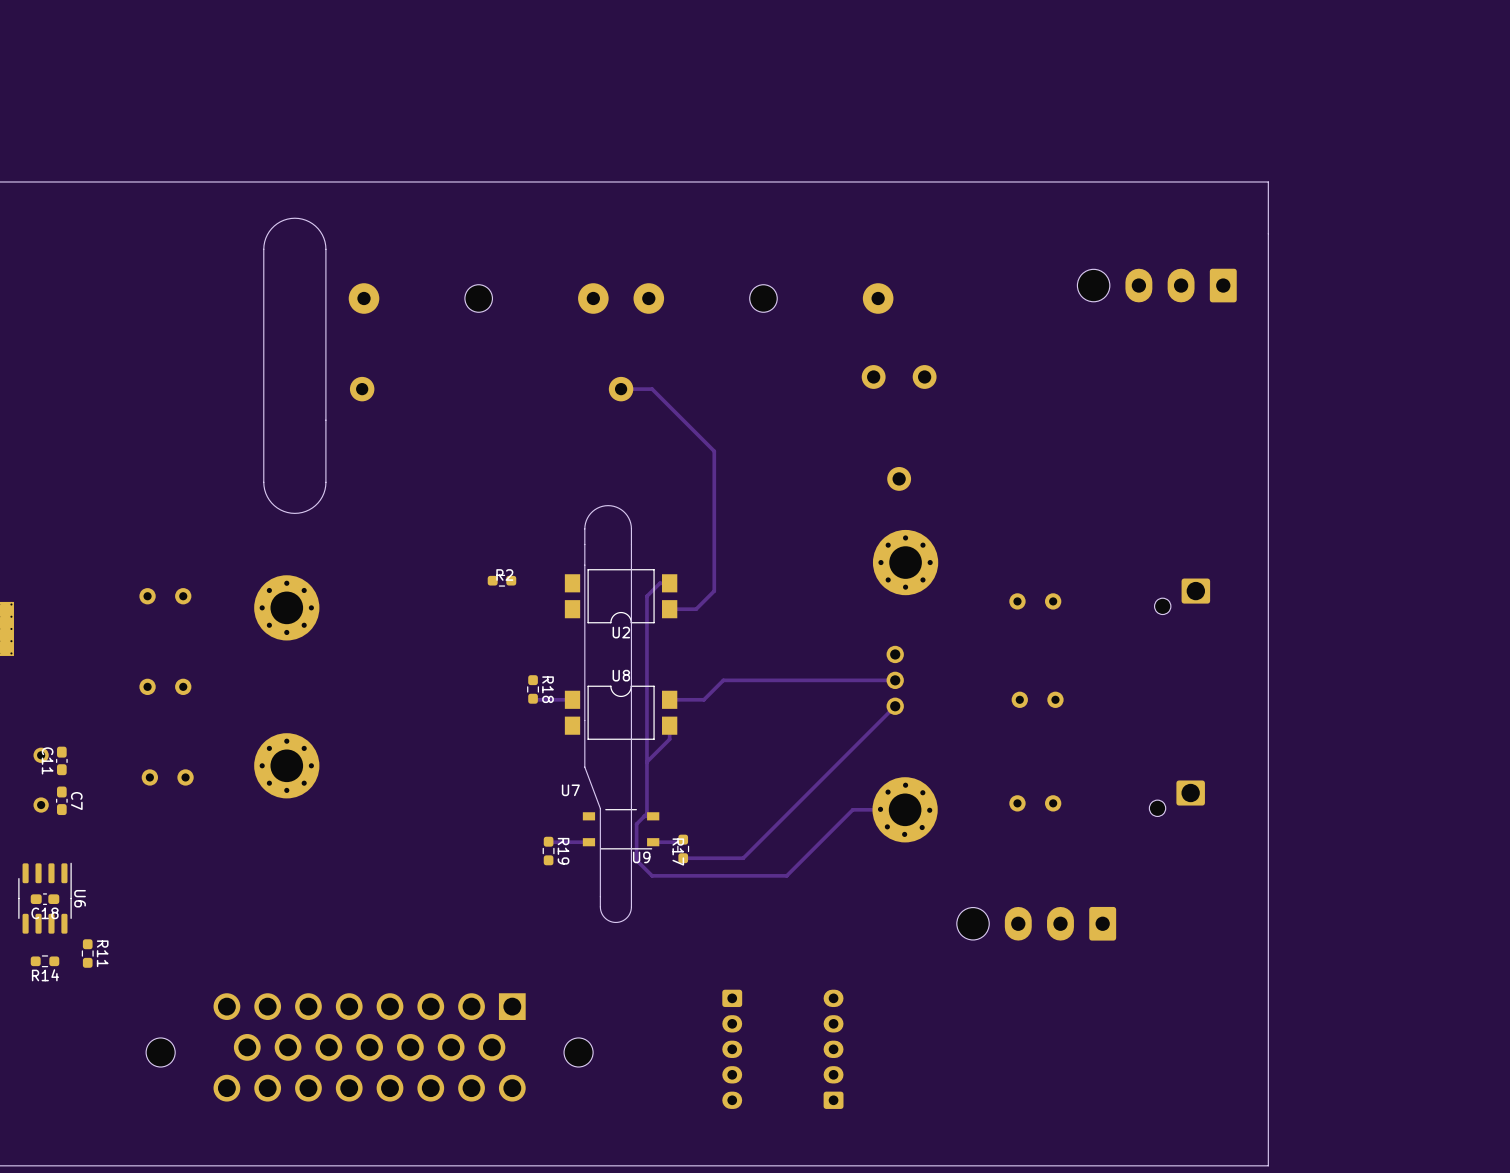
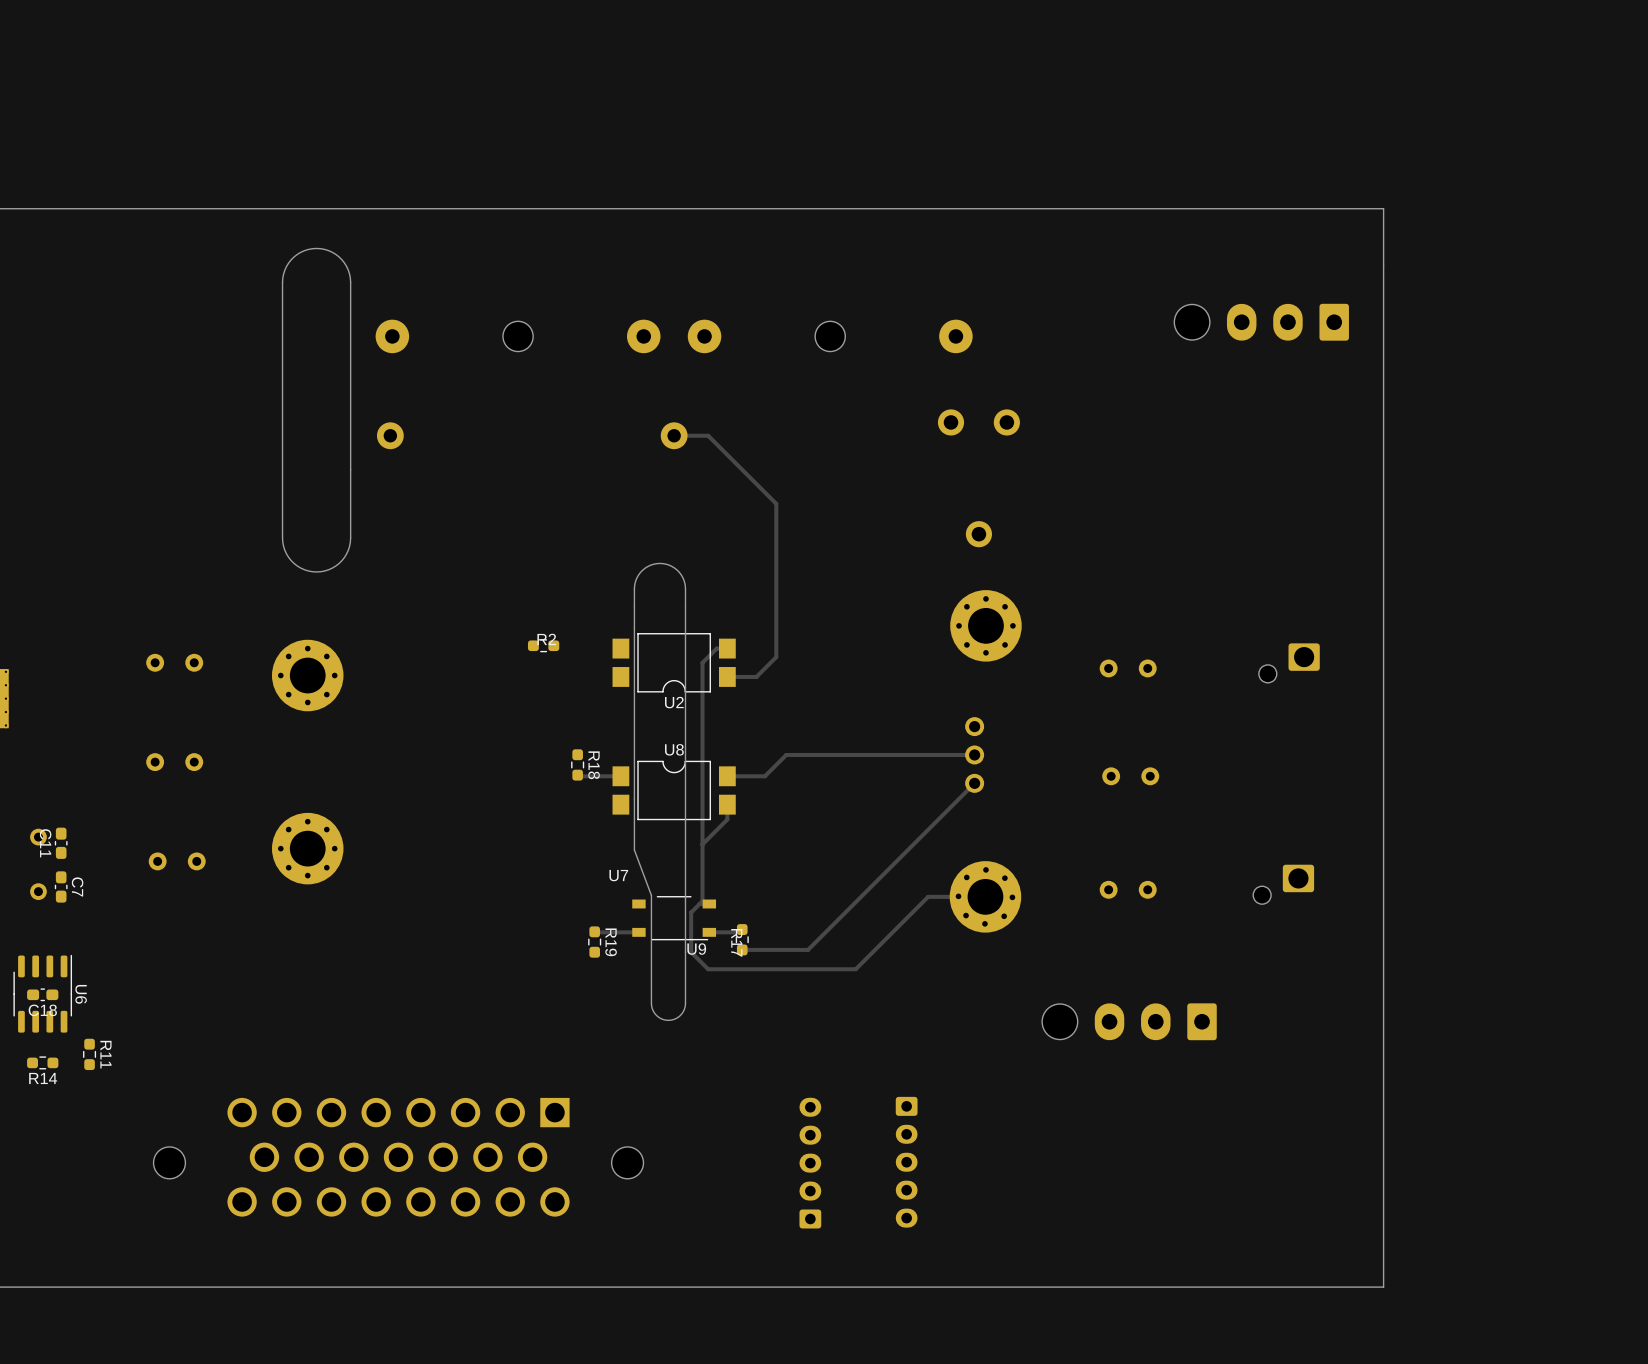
part rotation: 0° (732, 1049) -> 180° (810, 1163)
part rotation: 0° (833, 1049) -> 180° (906, 1162)

